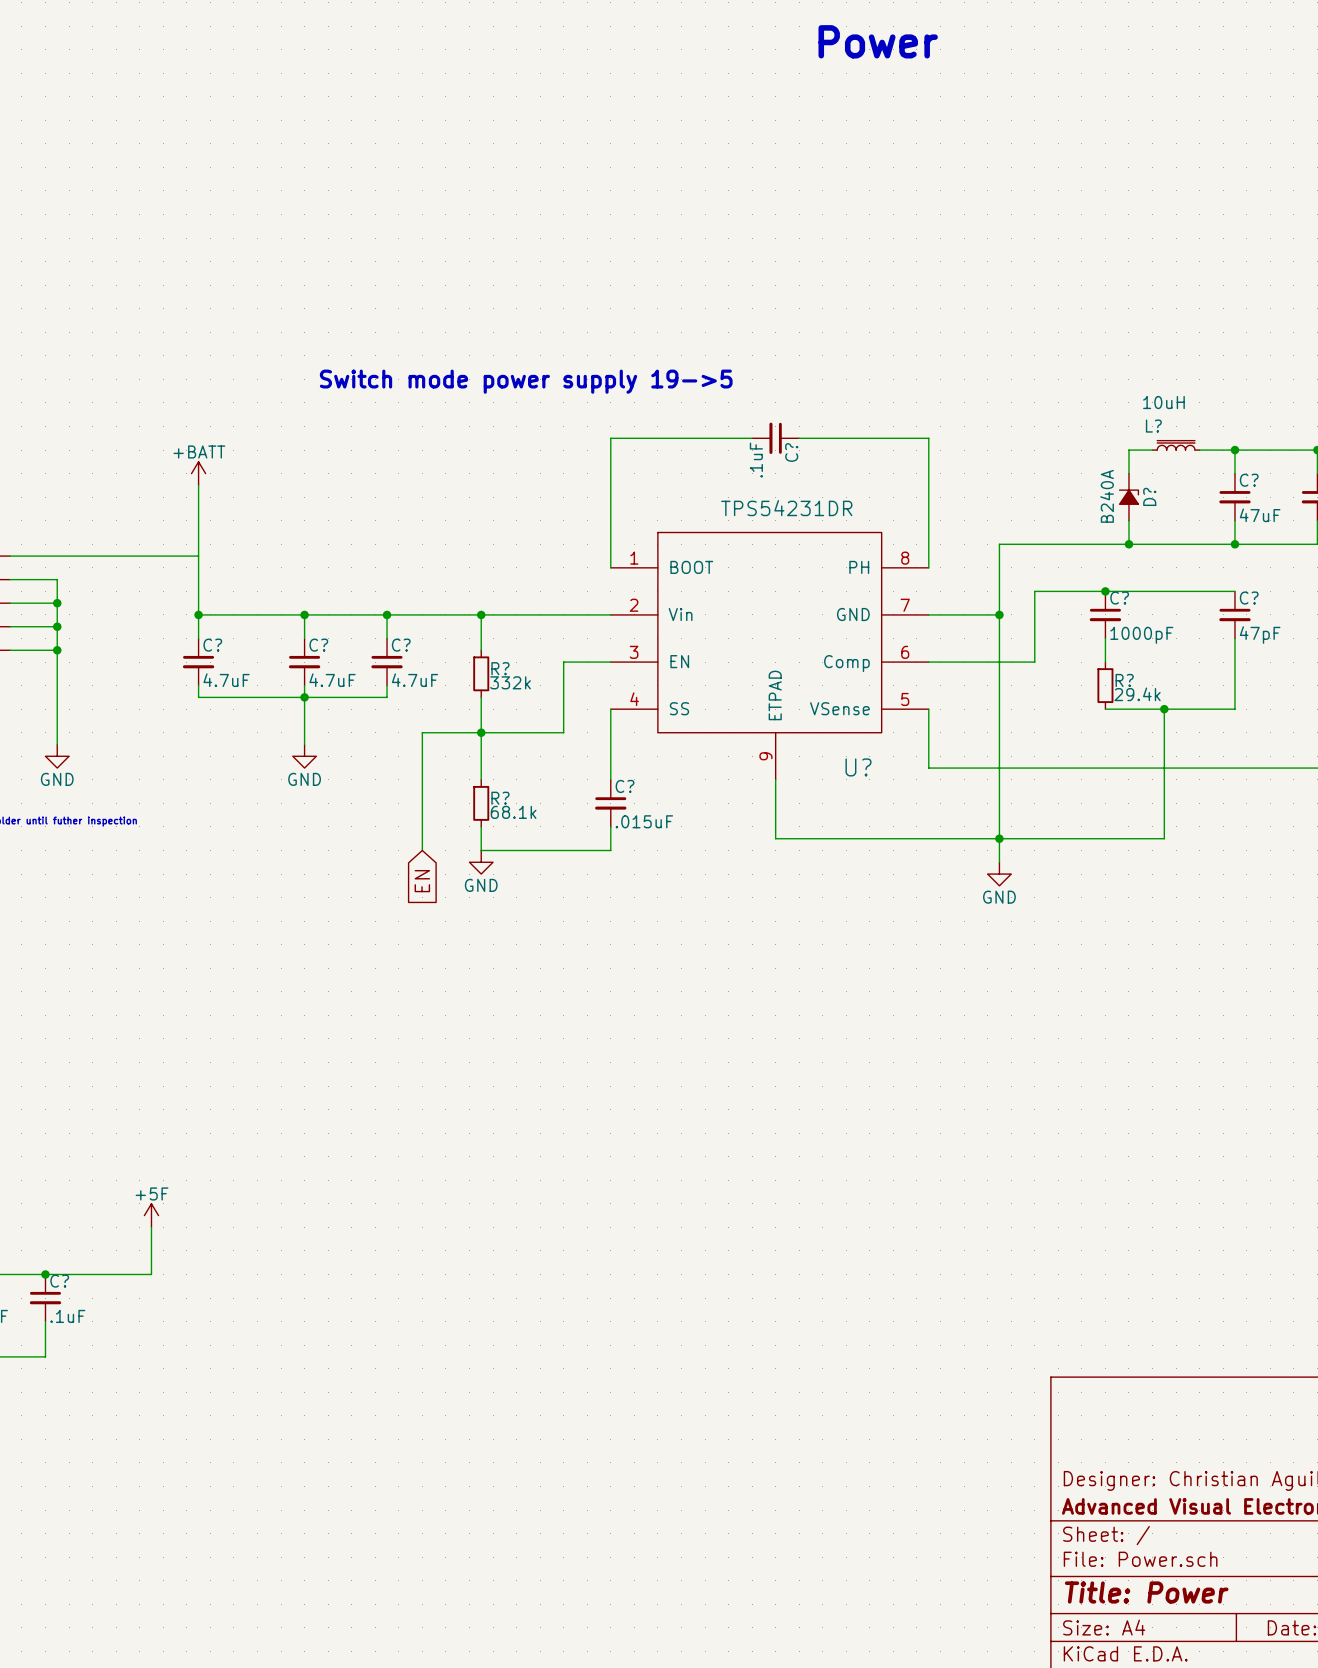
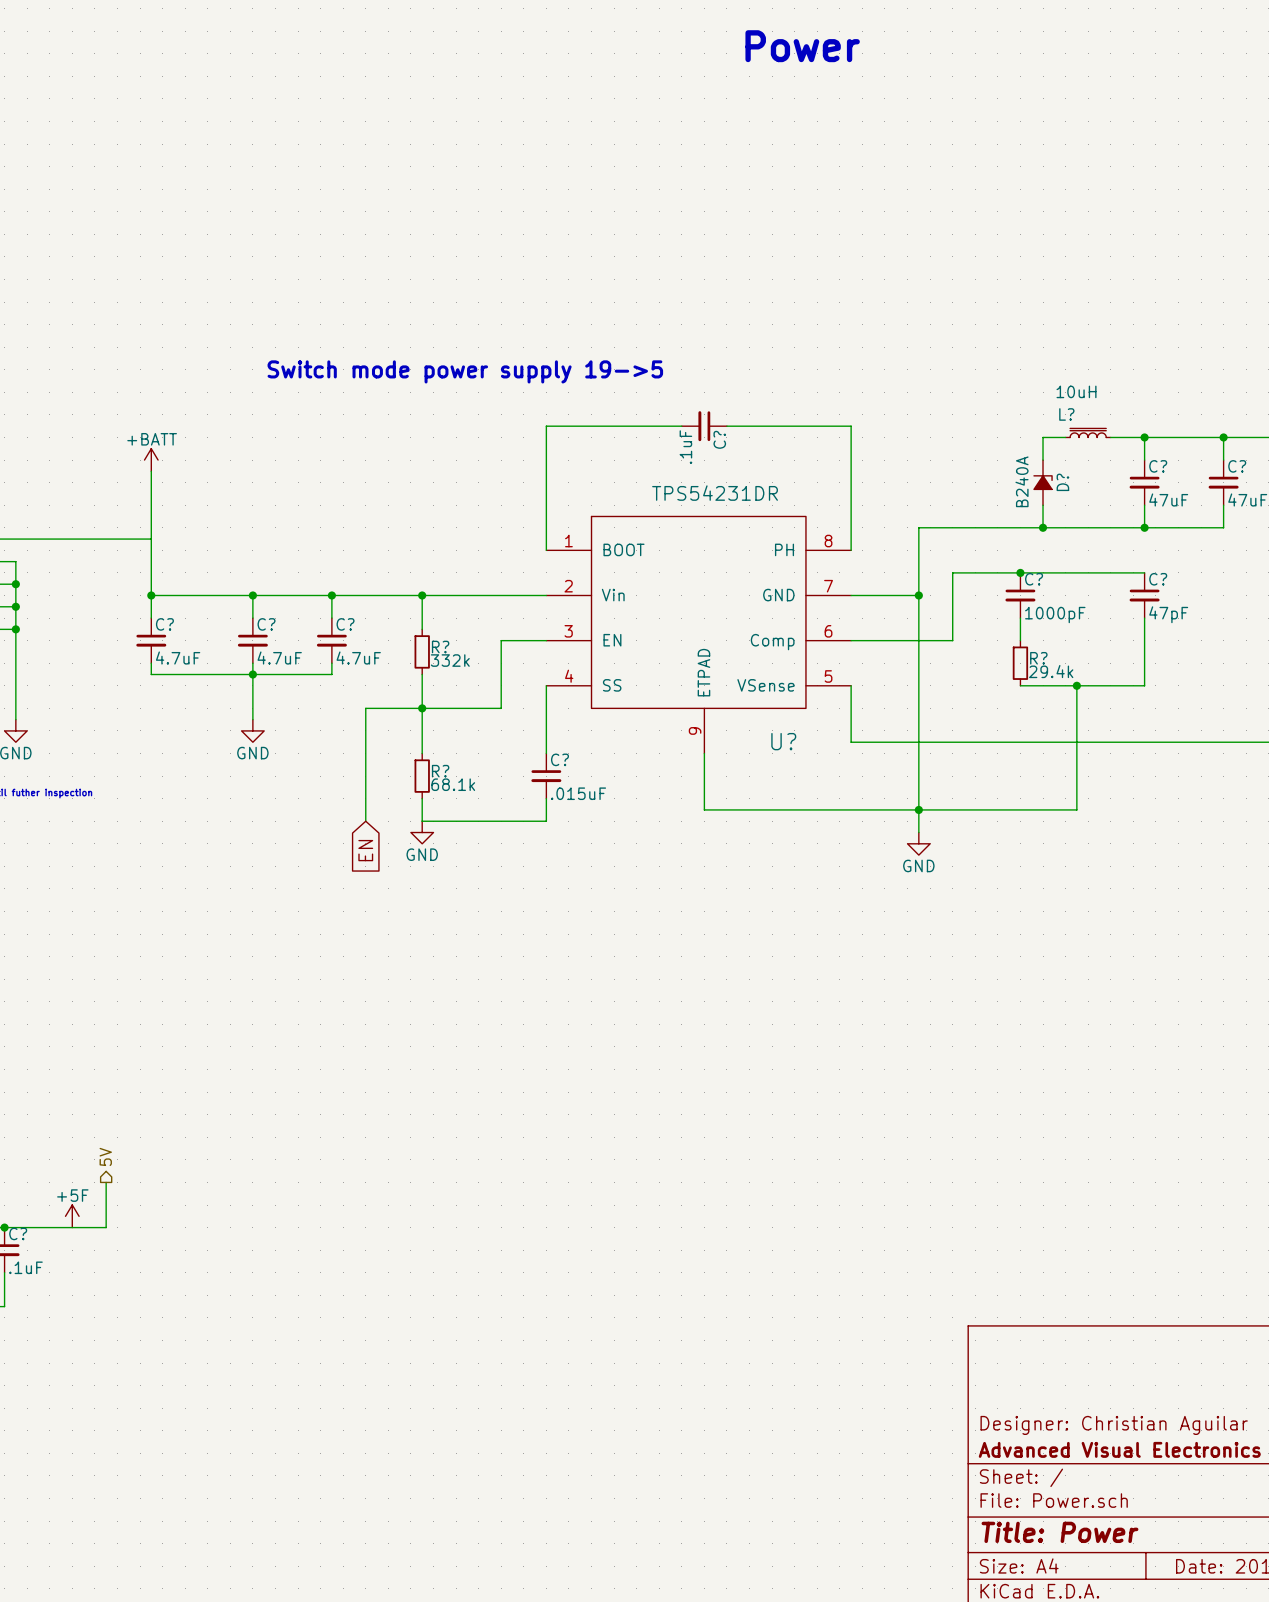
hierarchical label: none -> 5V (105, 1156)
power symbol position: +5F (151, 1215) -> +5F (72, 1216)

